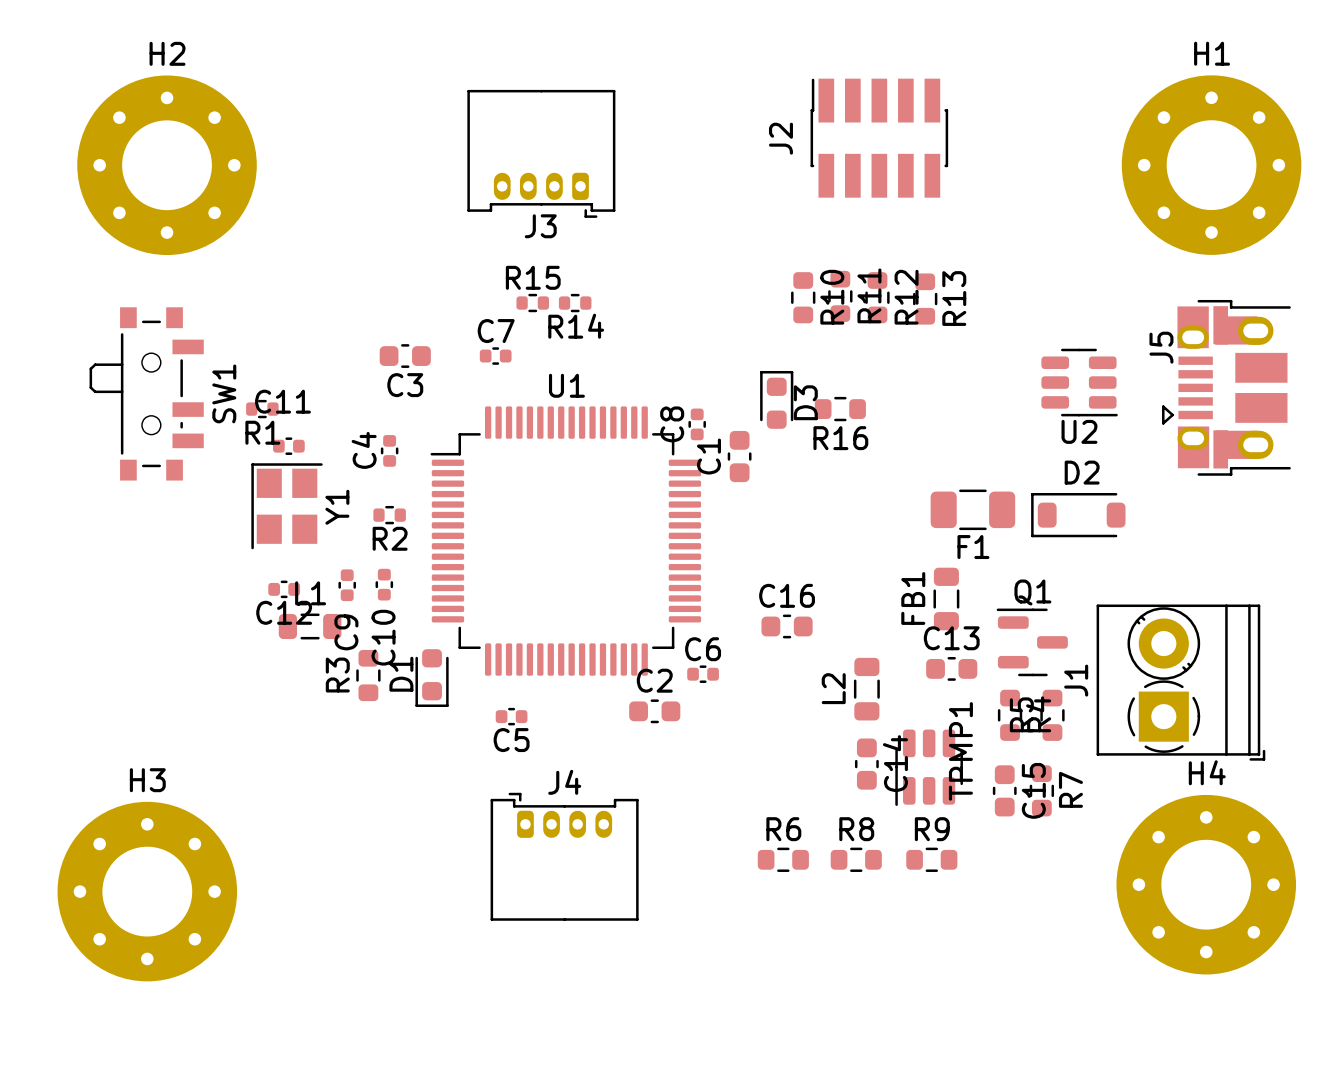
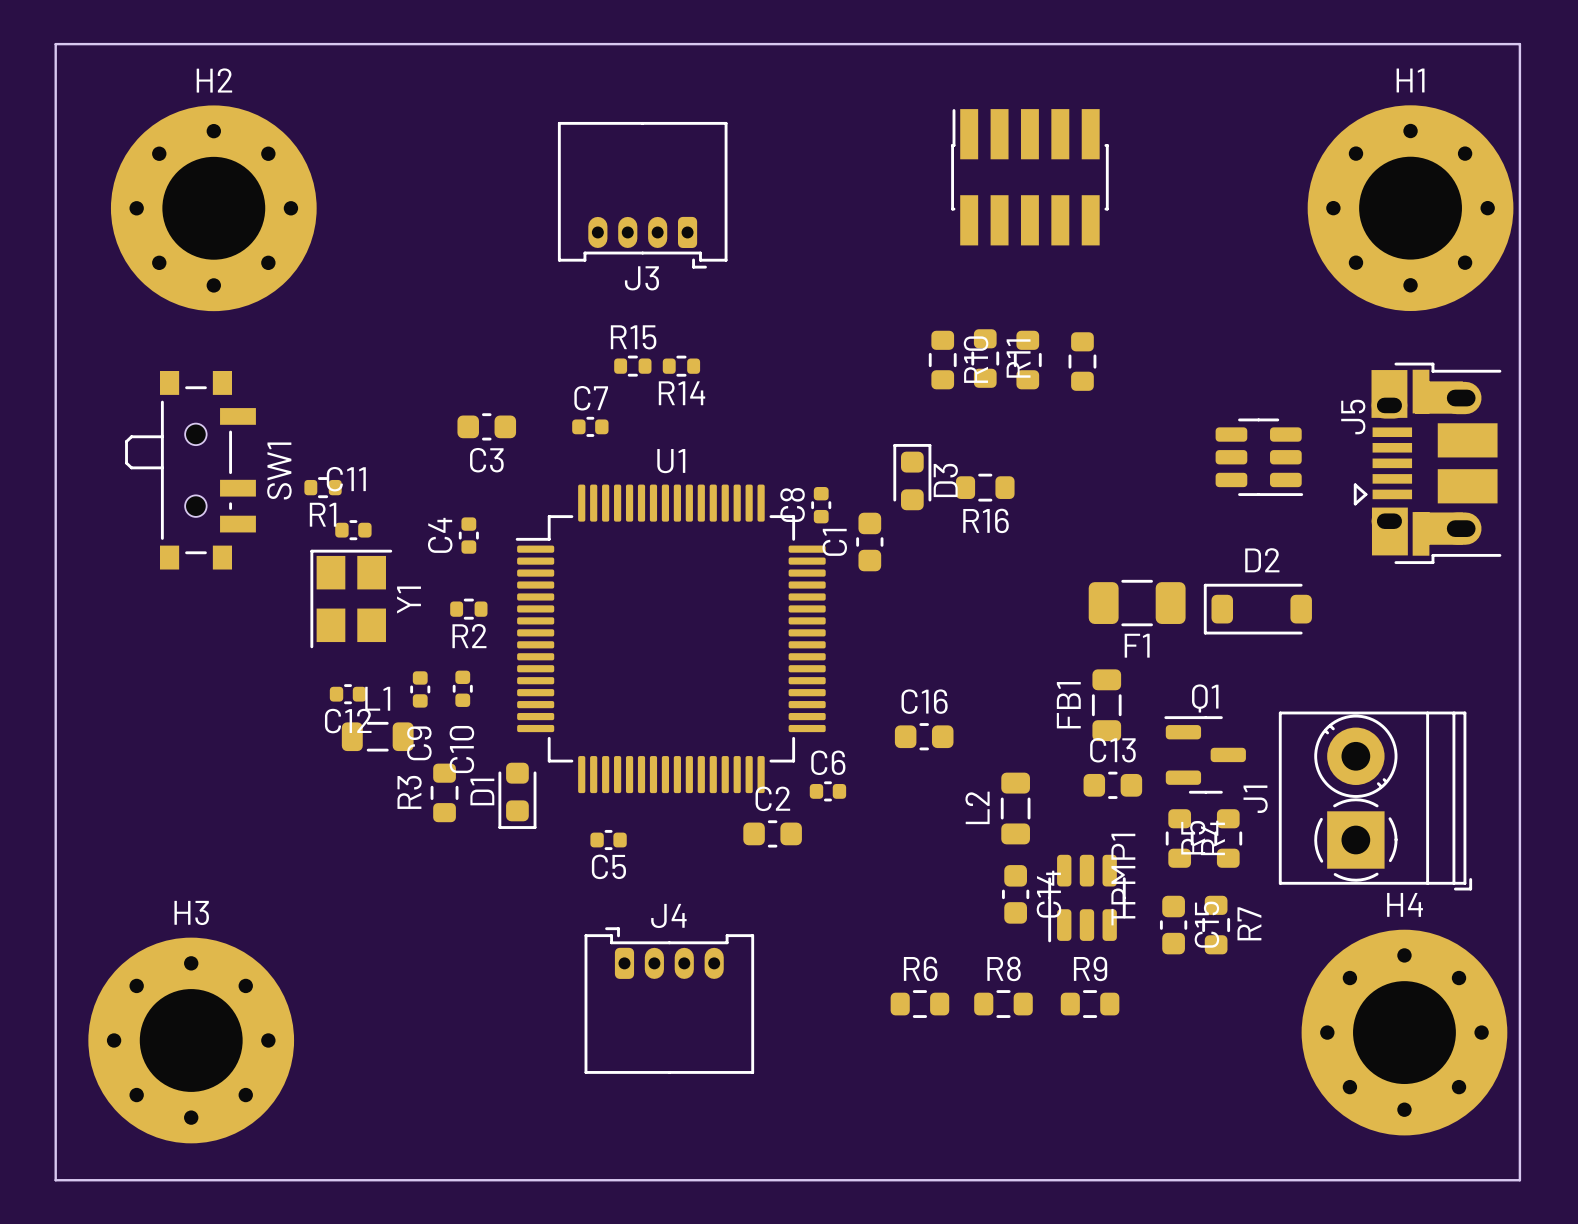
board edge: none -> (55, 44) (1519, 44) (1519, 1180) (55, 1180) (55, 44)
J2 name: J2 (780, 138) -> none
R12 name: R12 (906, 297) -> none
R13 name: R13 (954, 298) -> none
U2 name: U2 (1079, 431) -> none

